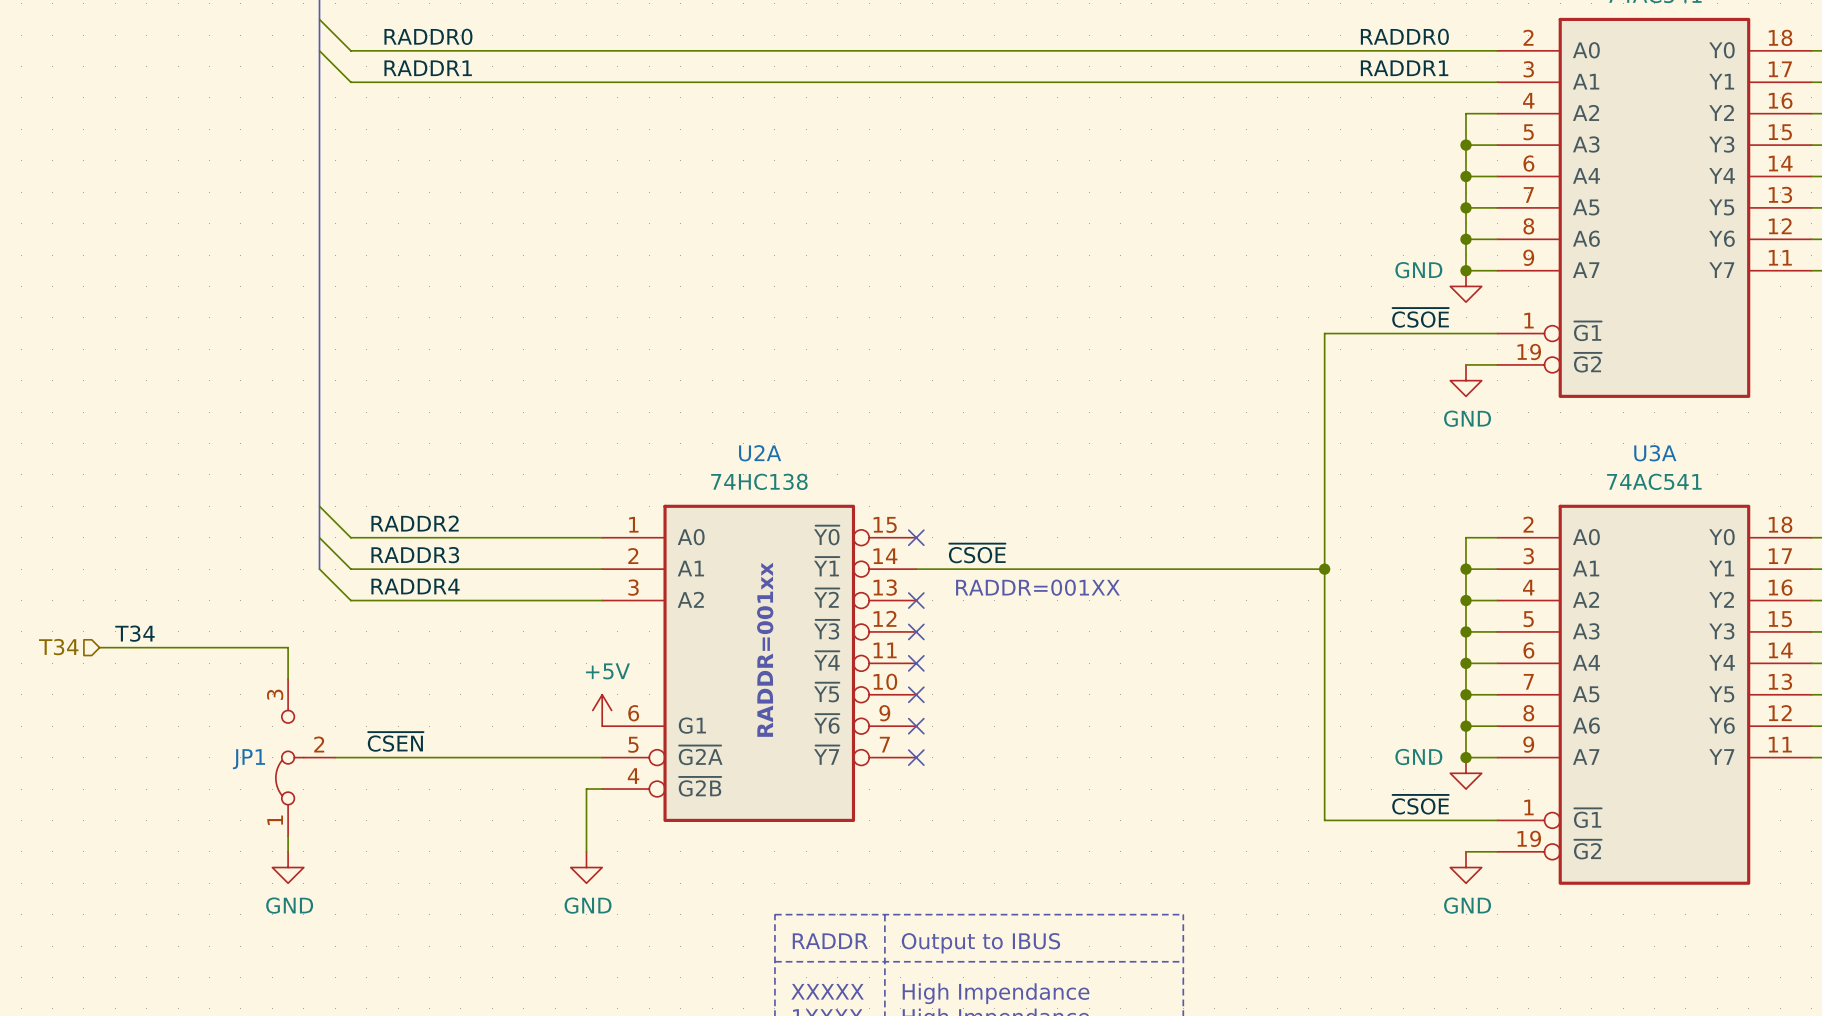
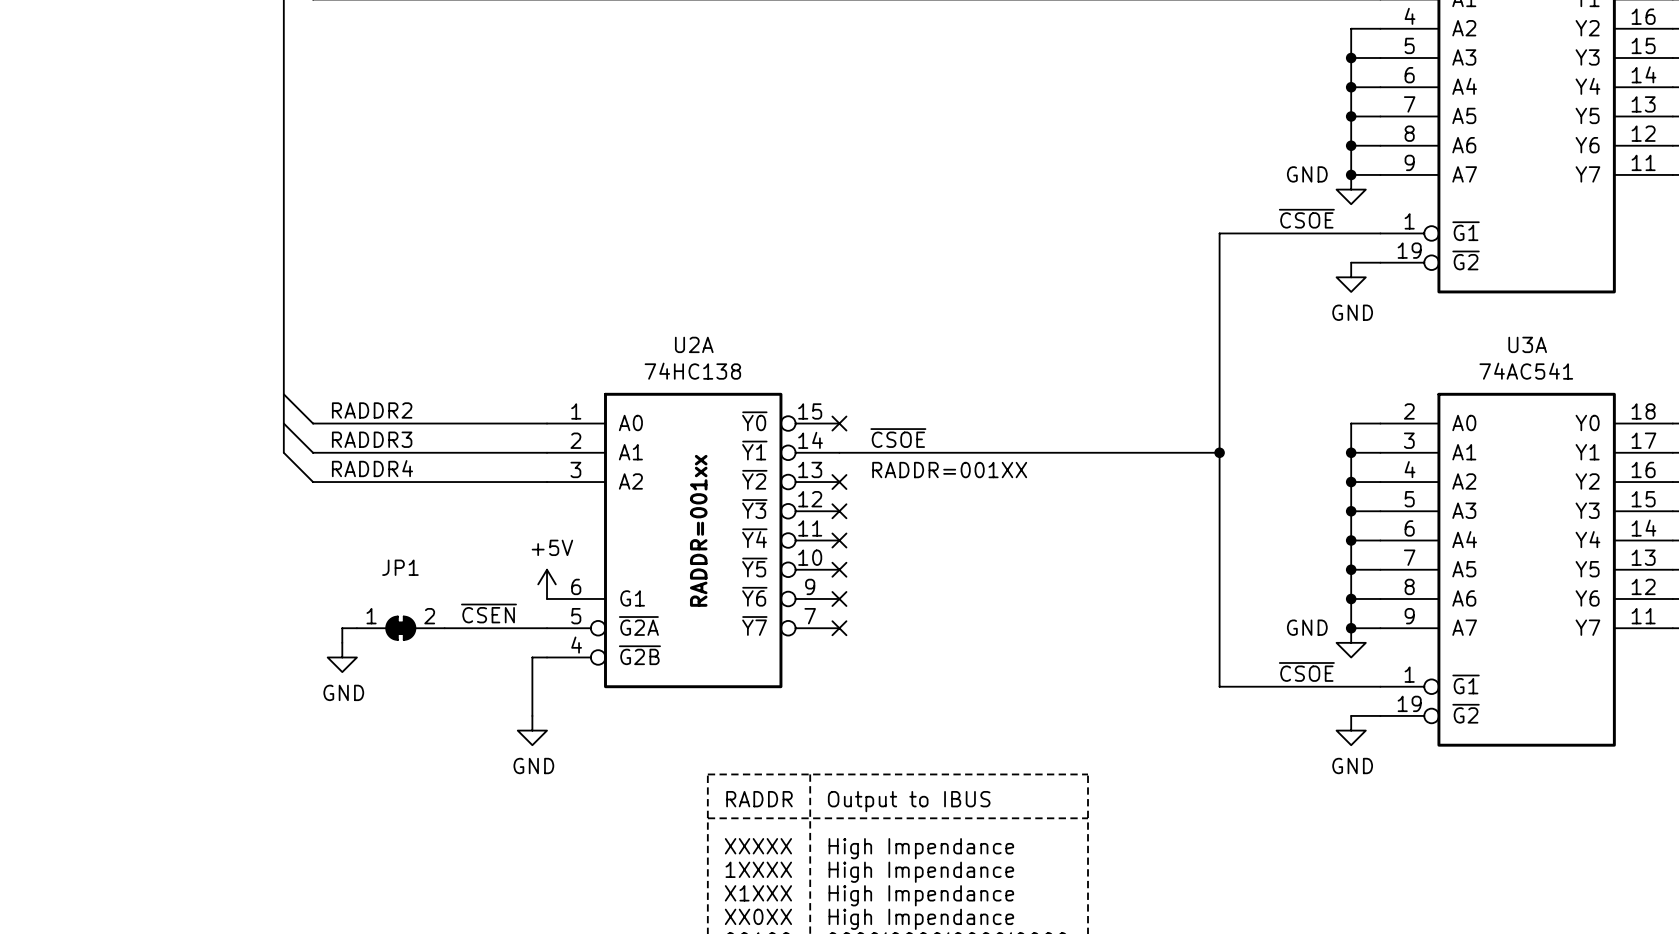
label: T34 (134, 633) -> none
hierarchical label: T34 (58, 647) -> none
wire: (99, 647) (288, 647) (288, 679) -> none
JP1 symbol: [275, 679, 336, 837] -> [356, 616, 445, 640]
label position: ~{CSEN} (395, 741) -> ~{CSEN} (488, 613)
wire: (335, 757) (382, 757) -> (342, 642) (342, 628)
JP1 name position: JP1 (248, 759) -> JP1 (400, 567)
wire: (288, 836) (288, 851) -> none
power symbol position: GND (288, 867) -> GND (342, 657)

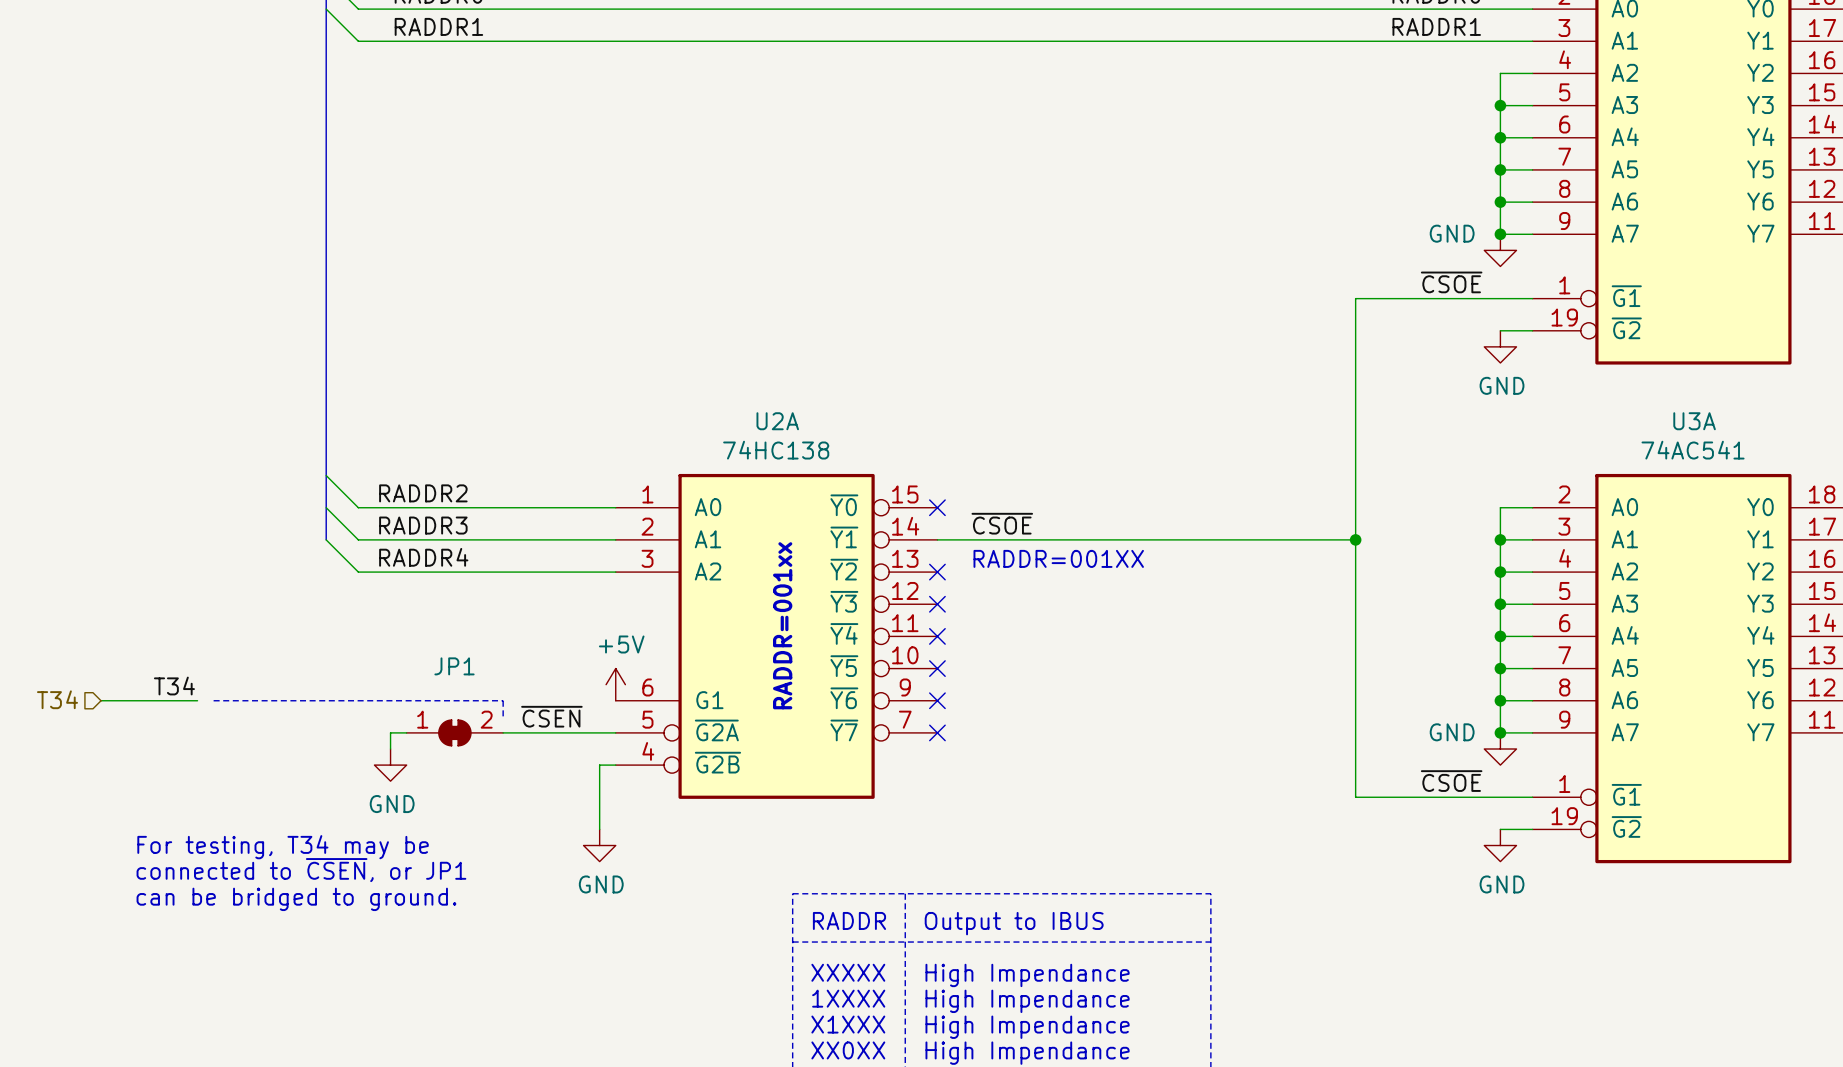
label: none -> T34 (174, 686)
hierarchical label: none -> T34 (57, 699)
wire: none -> (101, 700) (197, 700)
line: none -> (213, 700) (503, 700) (503, 716)
text: none -> For testing, T34 may be (283, 847)
text: none -> connected to ~{CSEN}, or JP1 (301, 870)
text: none -> can be bridged to ground. (296, 899)

